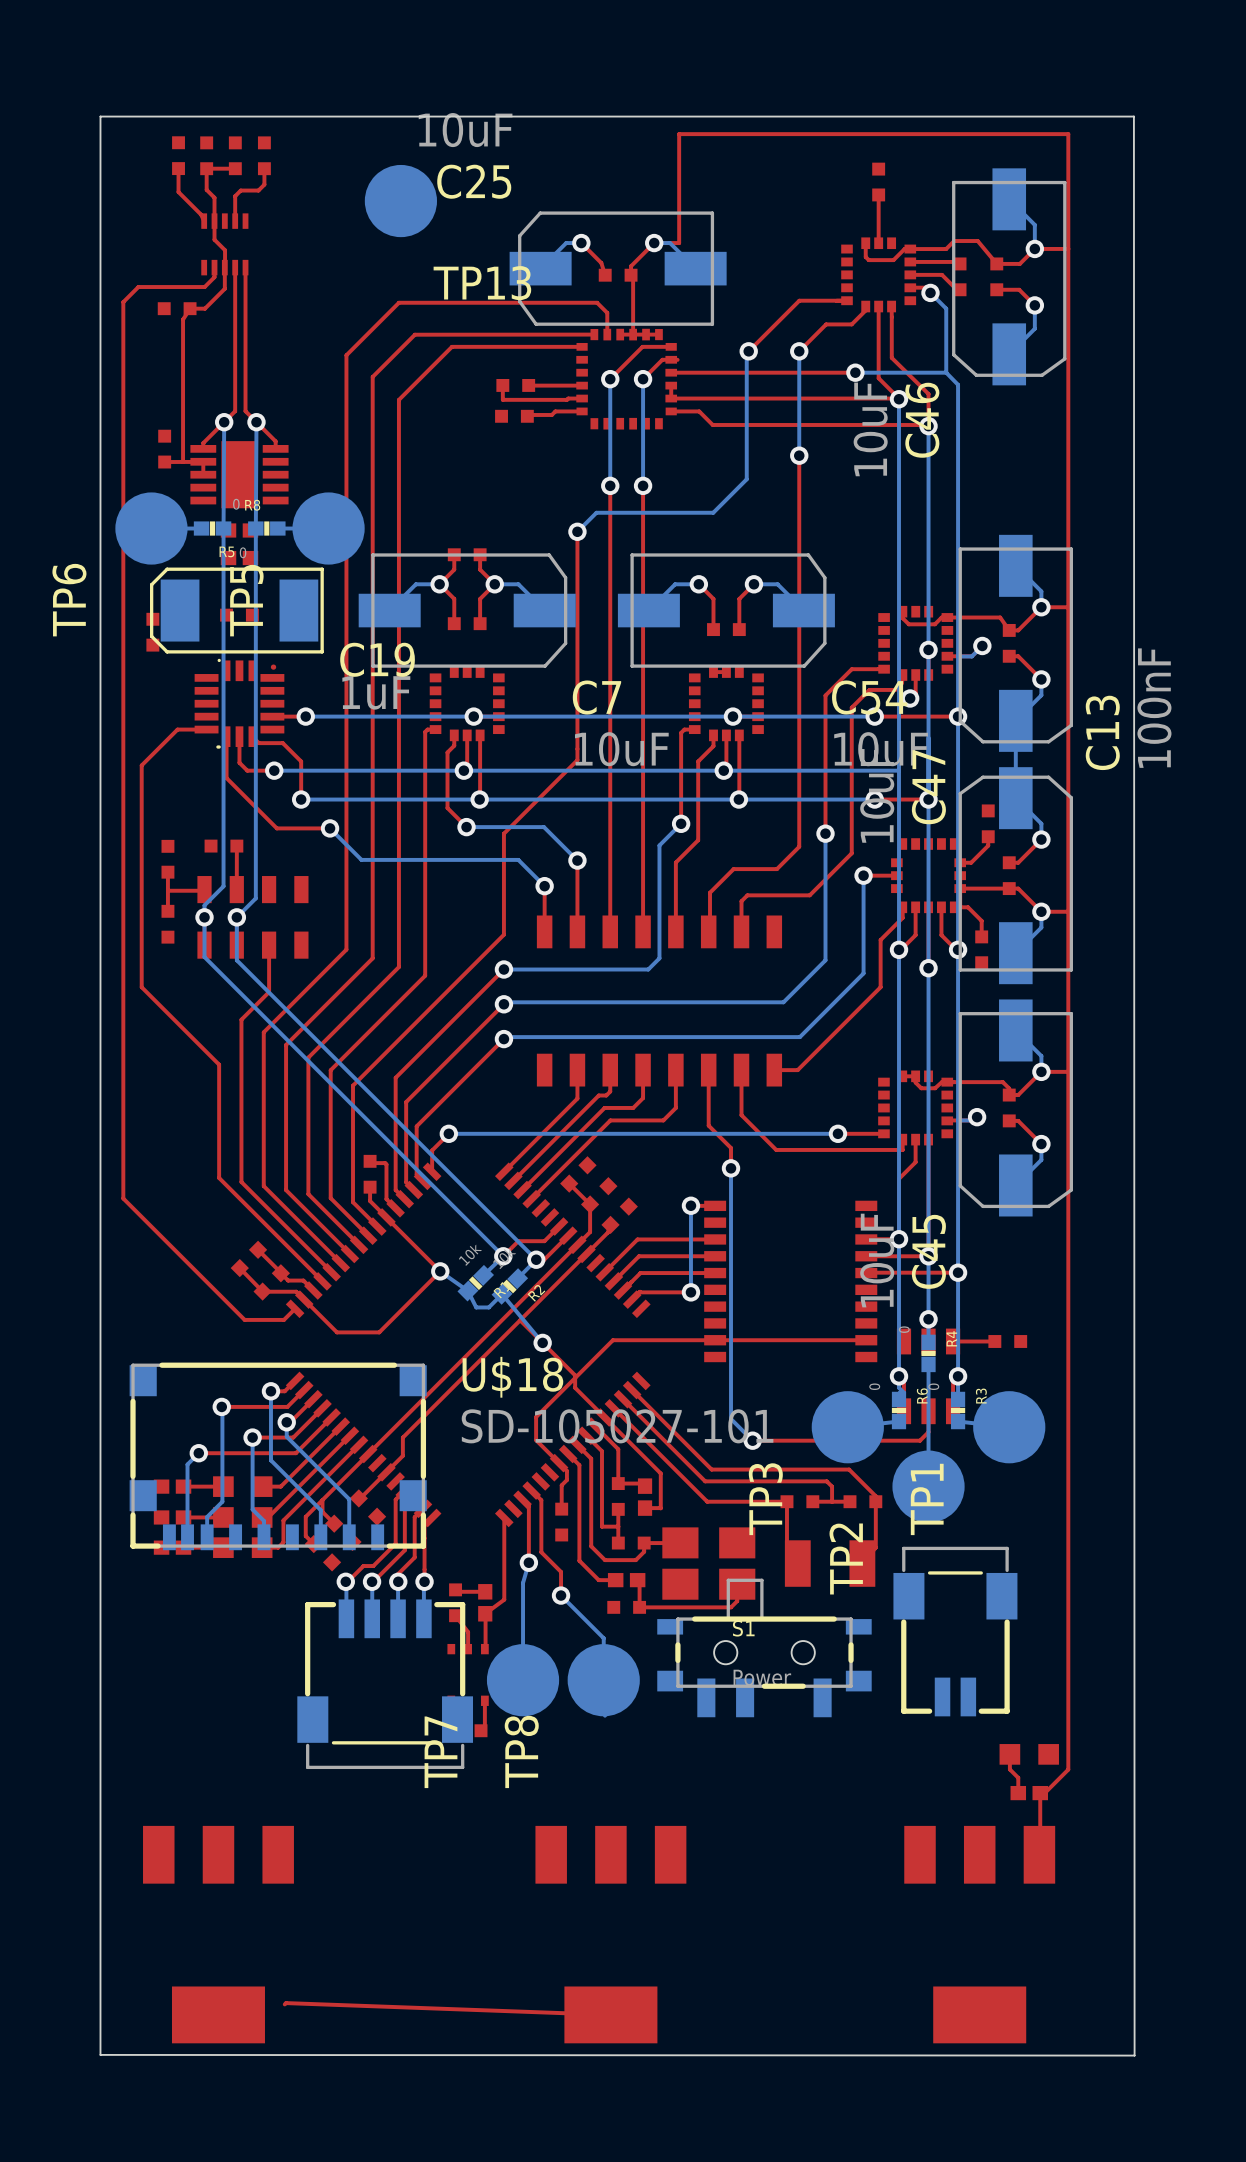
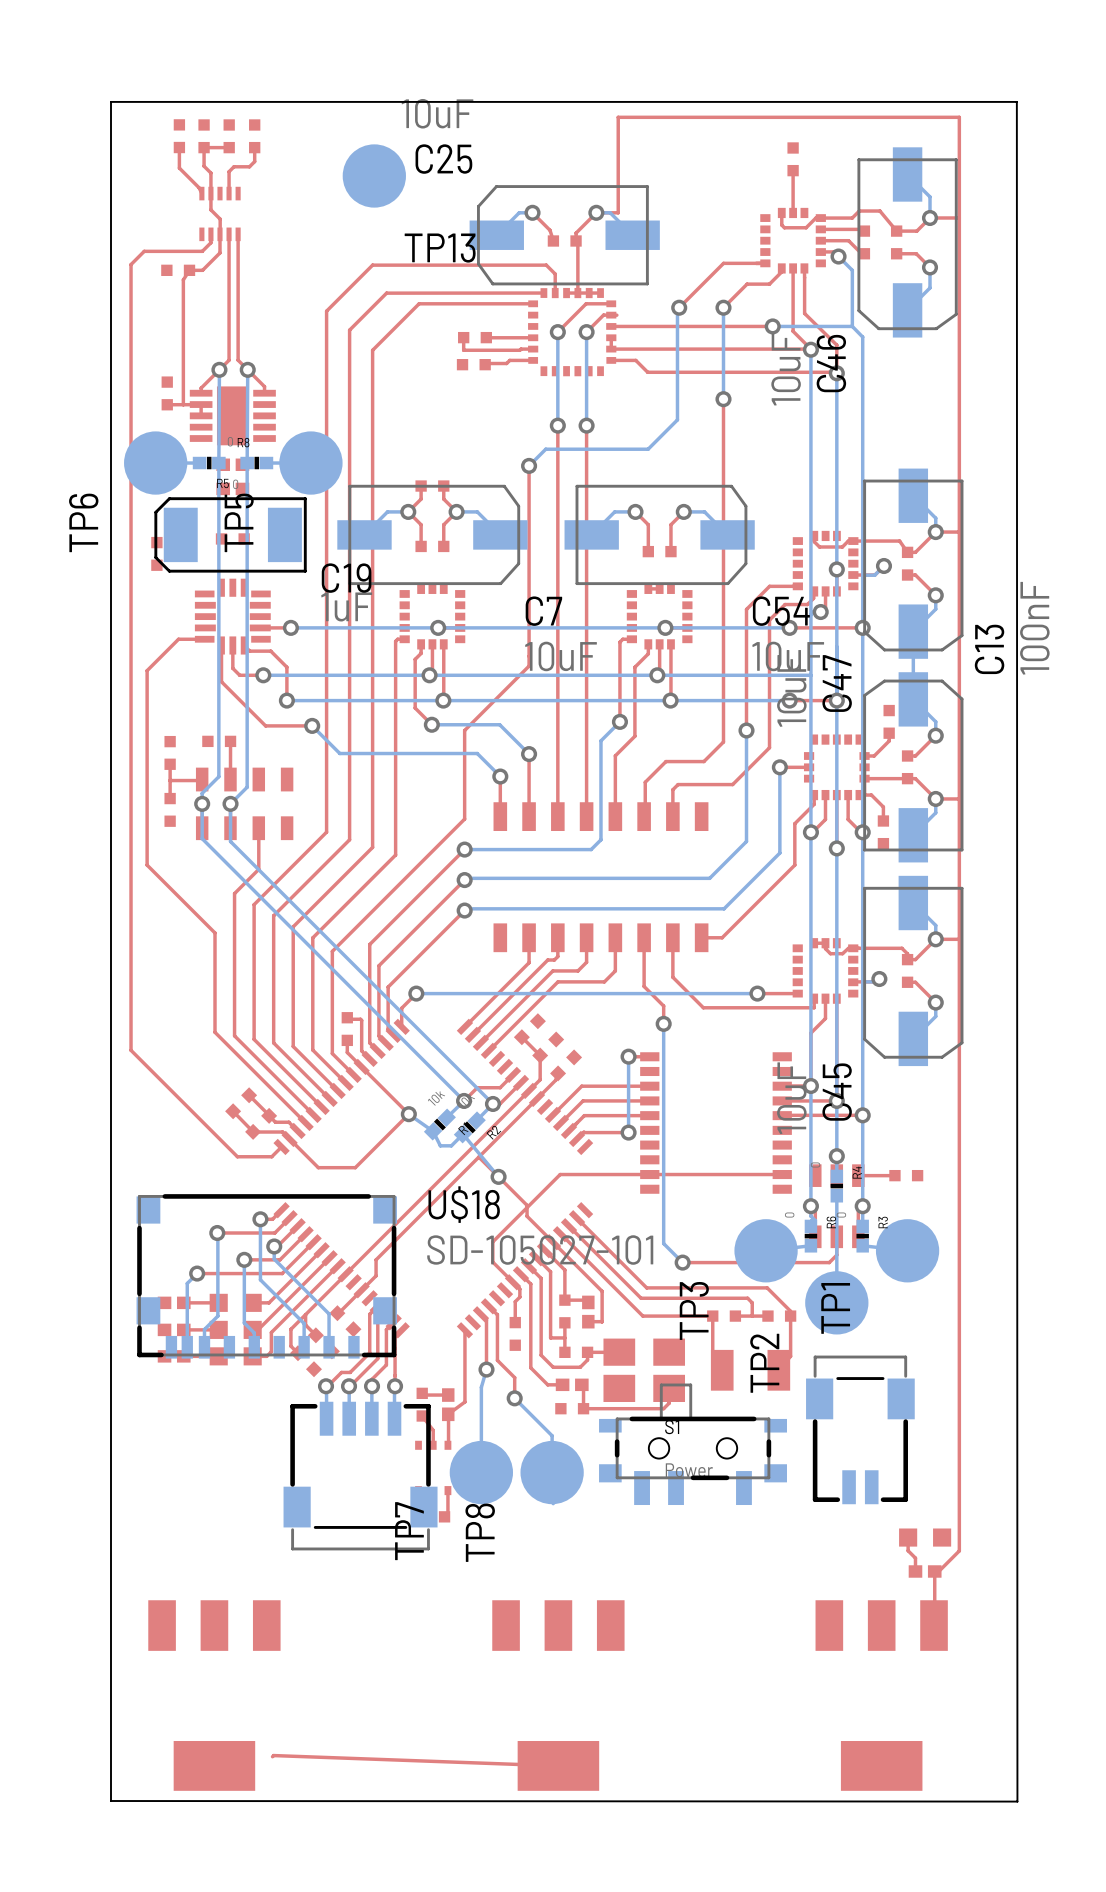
part footprint: [194, 658, 285, 749] -> [194, 578, 271, 655]

